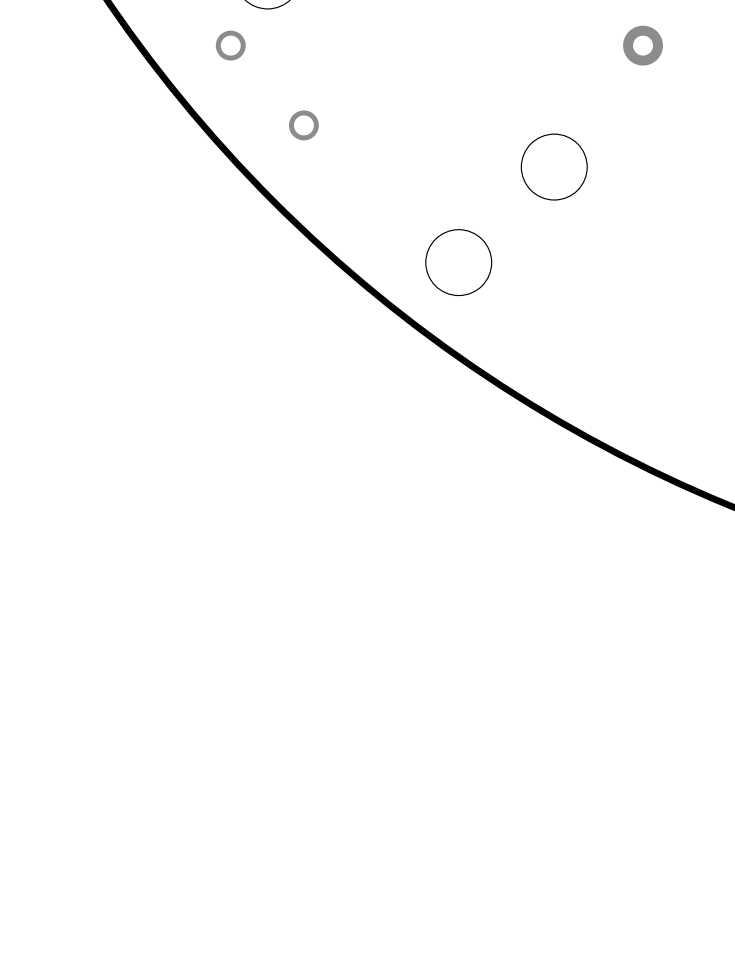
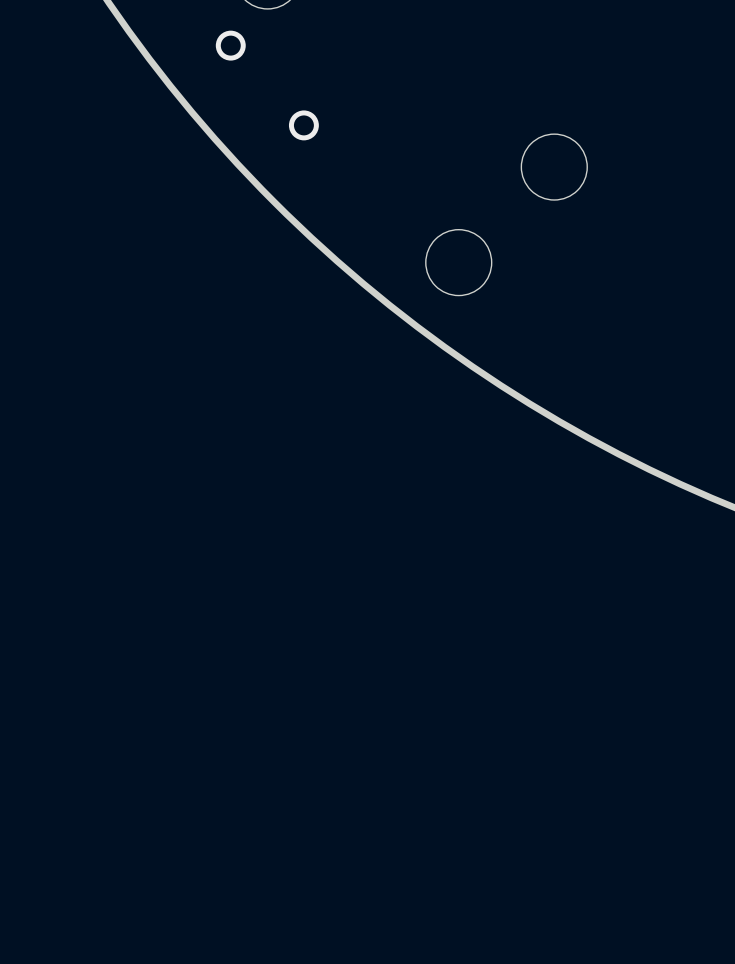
via: (643, 45) -> none

